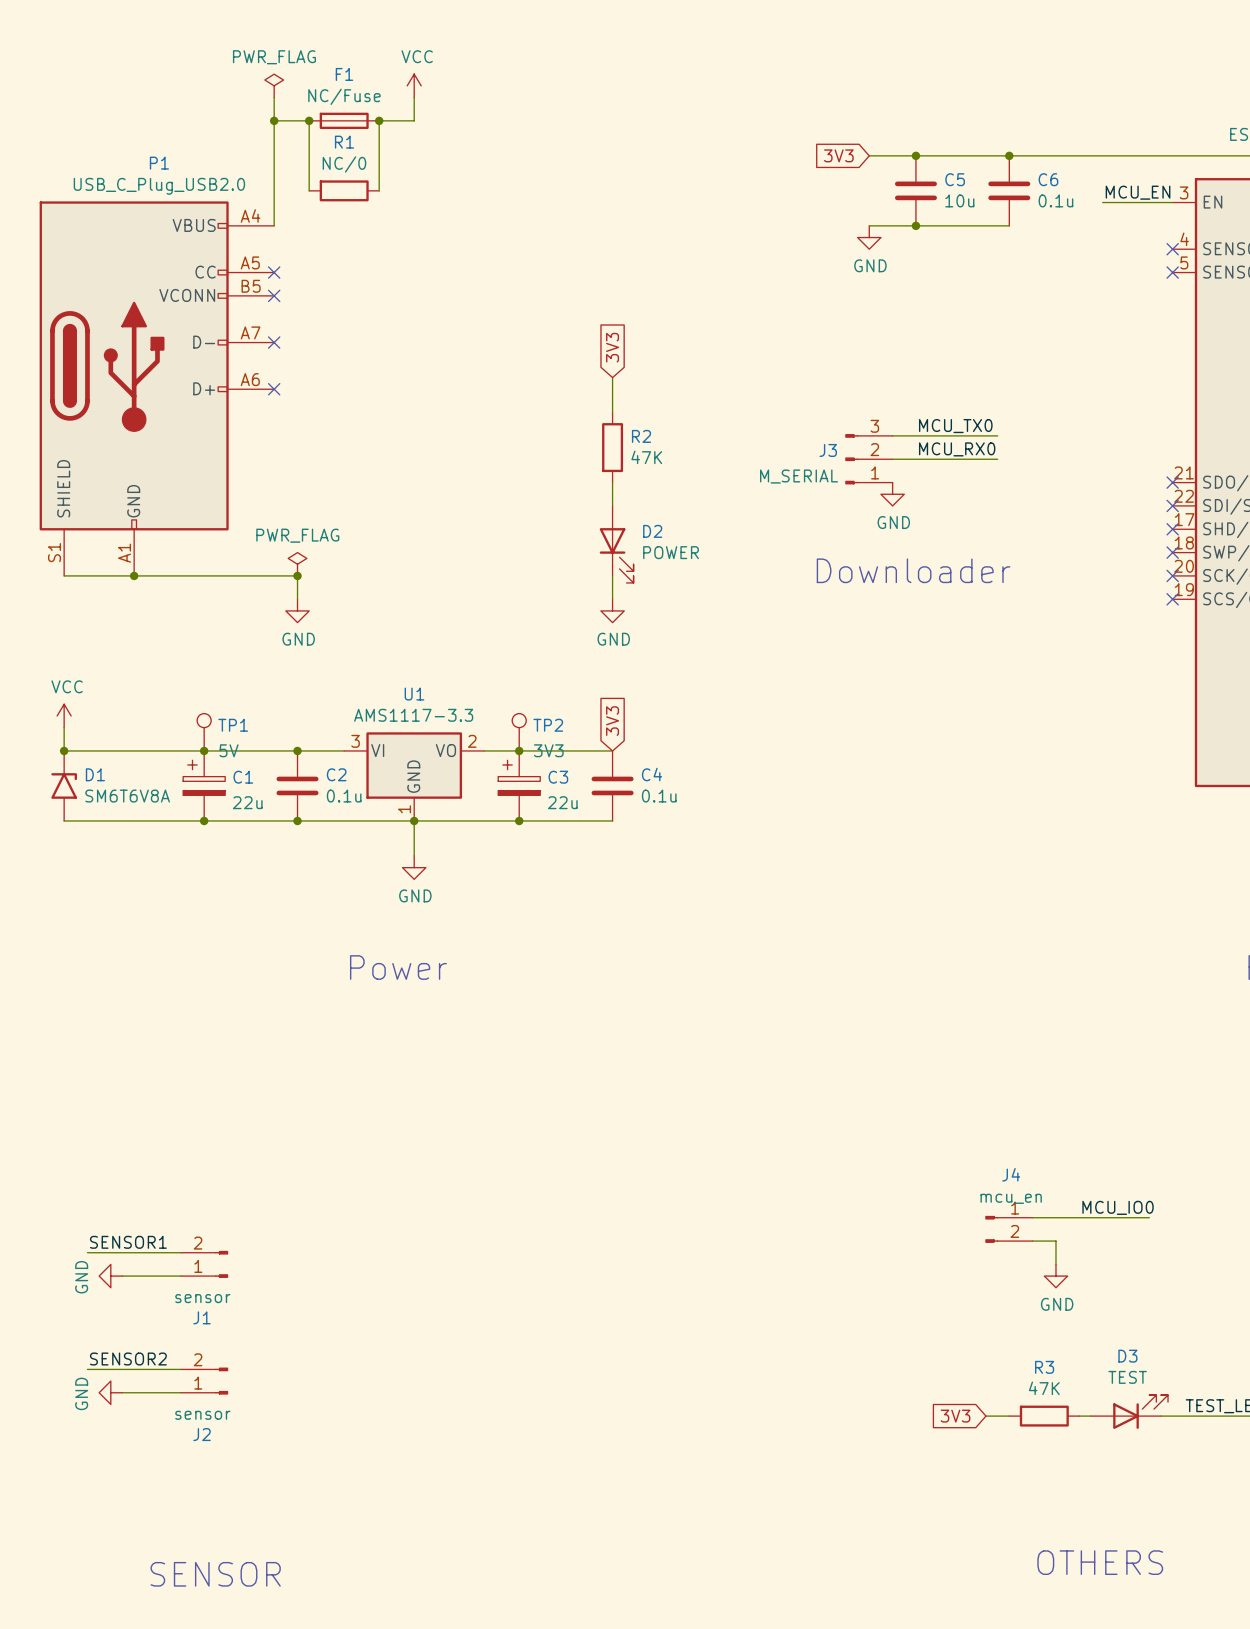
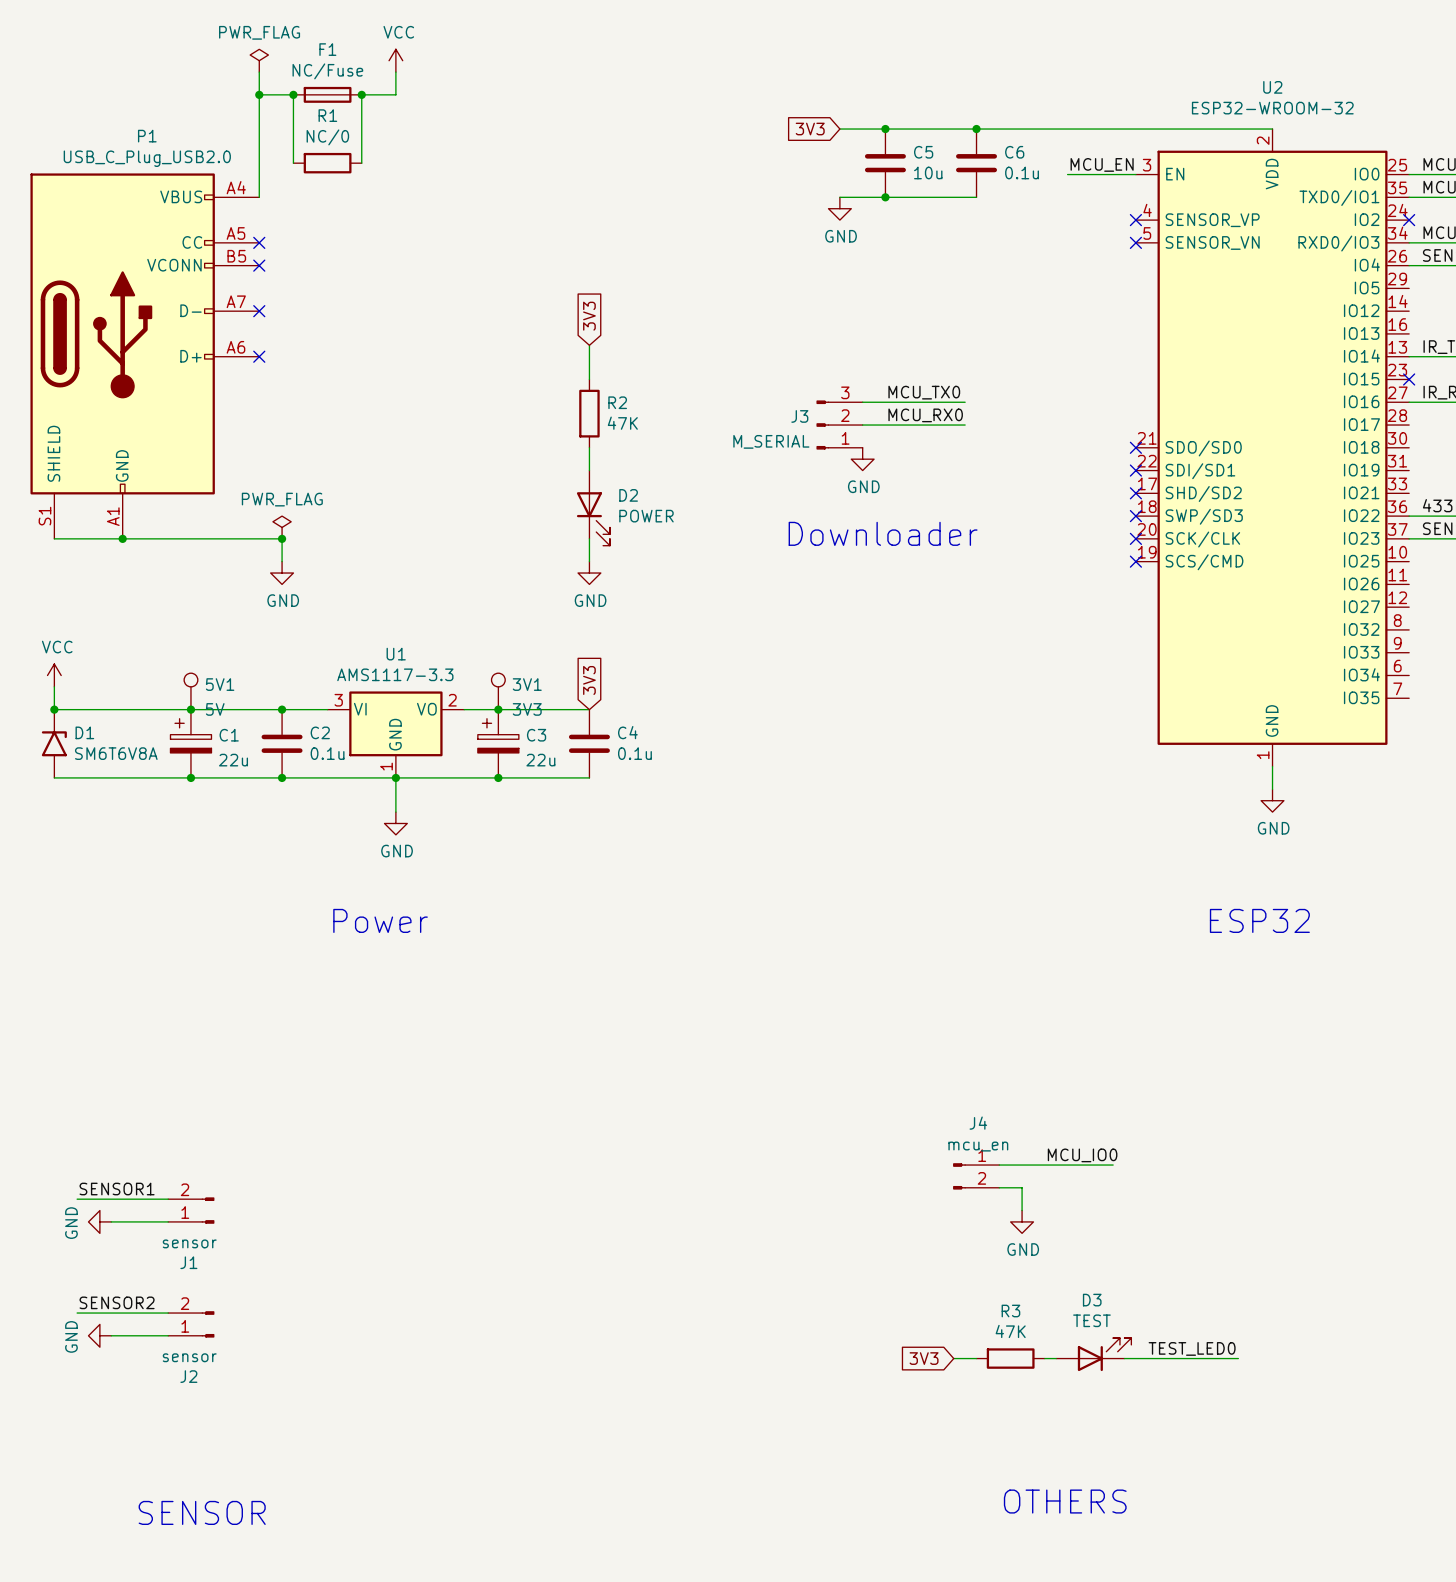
TP1 name: TP1 (233, 725) -> 5V1 (220, 684)
TP2 name: TP2 (548, 725) -> 3V1 (527, 684)

